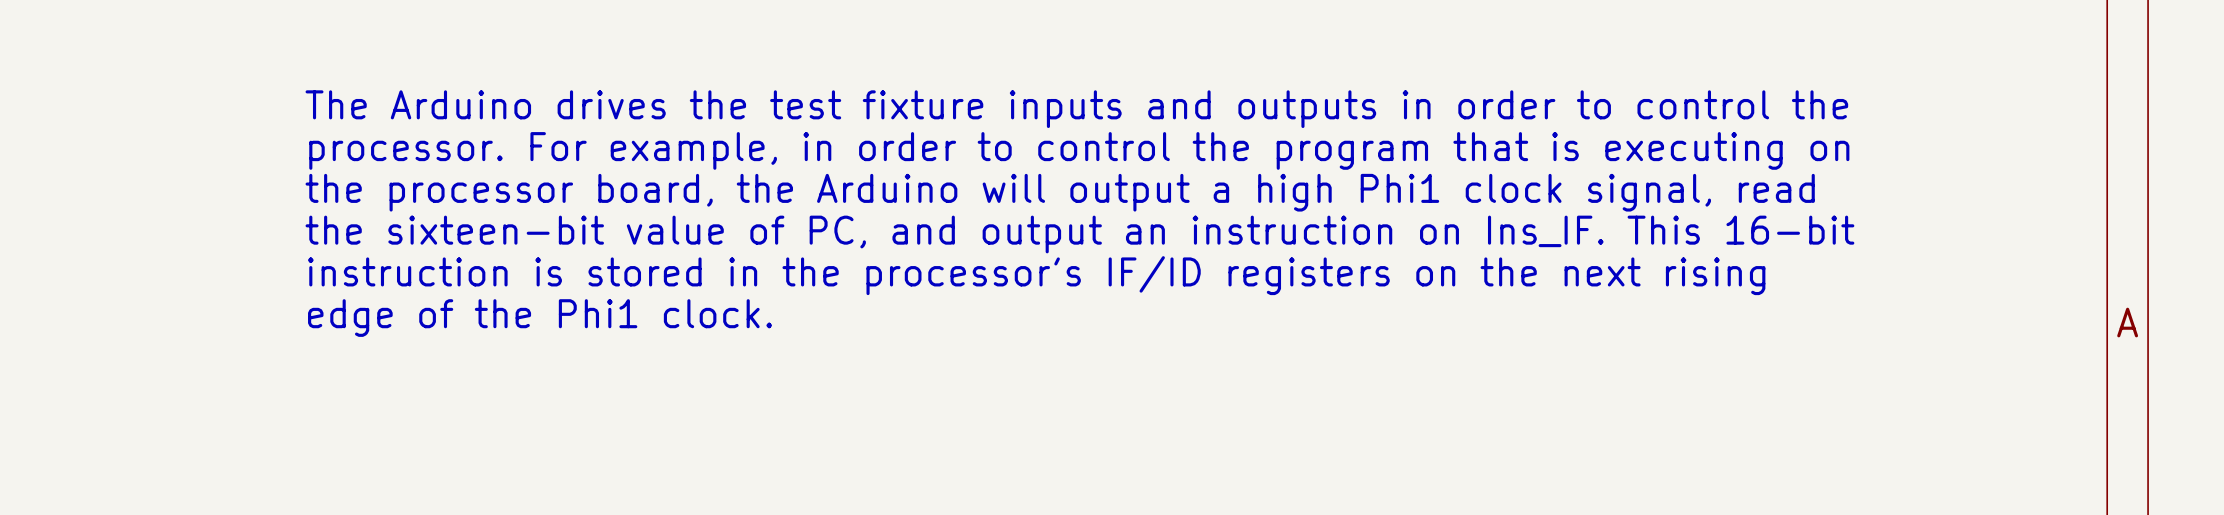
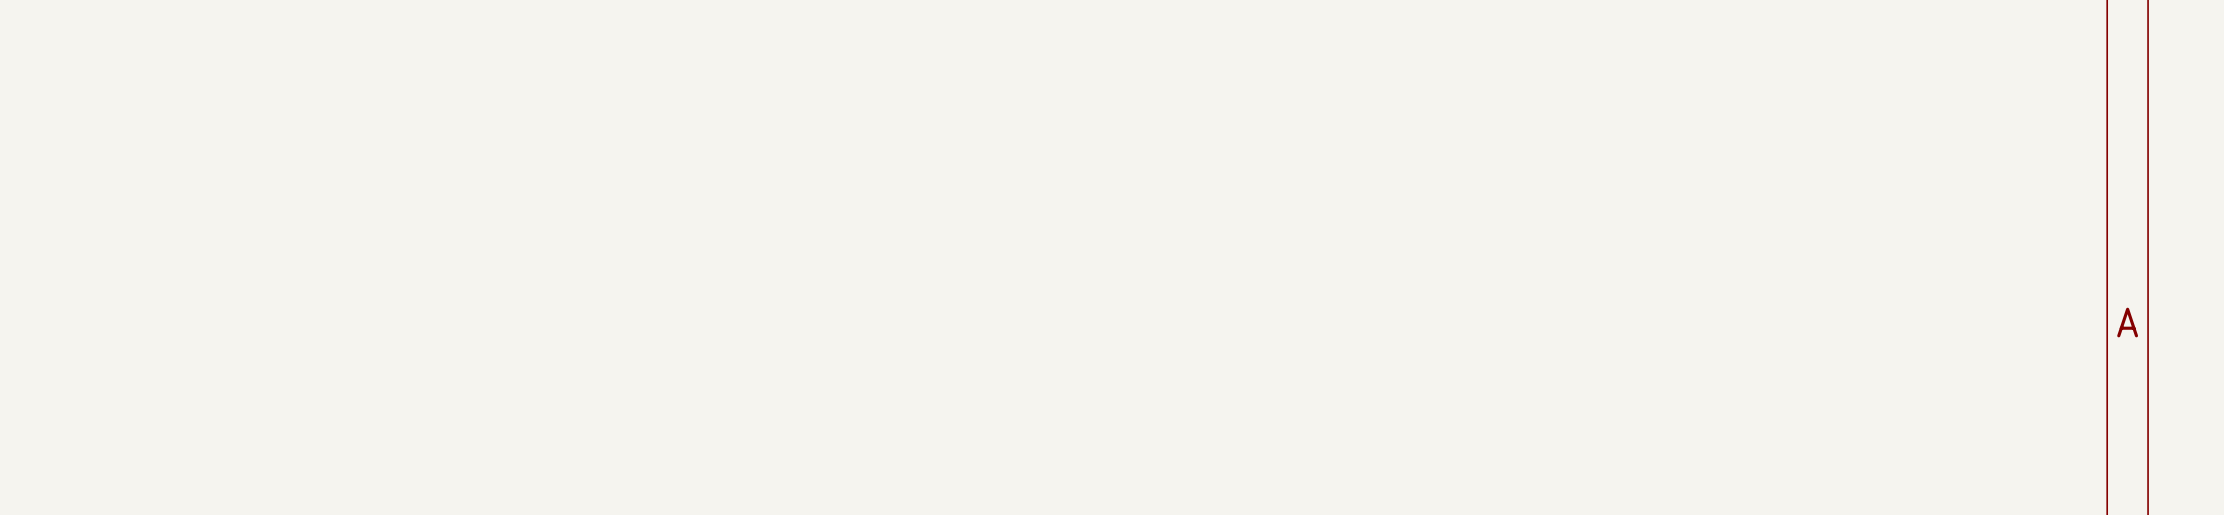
text: The Arduino drives the test fixture inputs and outputs in order to control the (1076, 109) -> none
text: processor. For example, in order to control the program that is executing on (1079, 150) -> none
text: the processor board, the Arduino will output a high Phi1 clock signal, read (1060, 192) -> none
text: the sixteen-bit value of PC, and output an instruction on Ins_IF. This 16-bit (1079, 234) -> none
text: instruction is stored in the processor's IF/ID registers on the next rising (1036, 275) -> none
text: edge of the Phi1 clock. (540, 318) -> none

